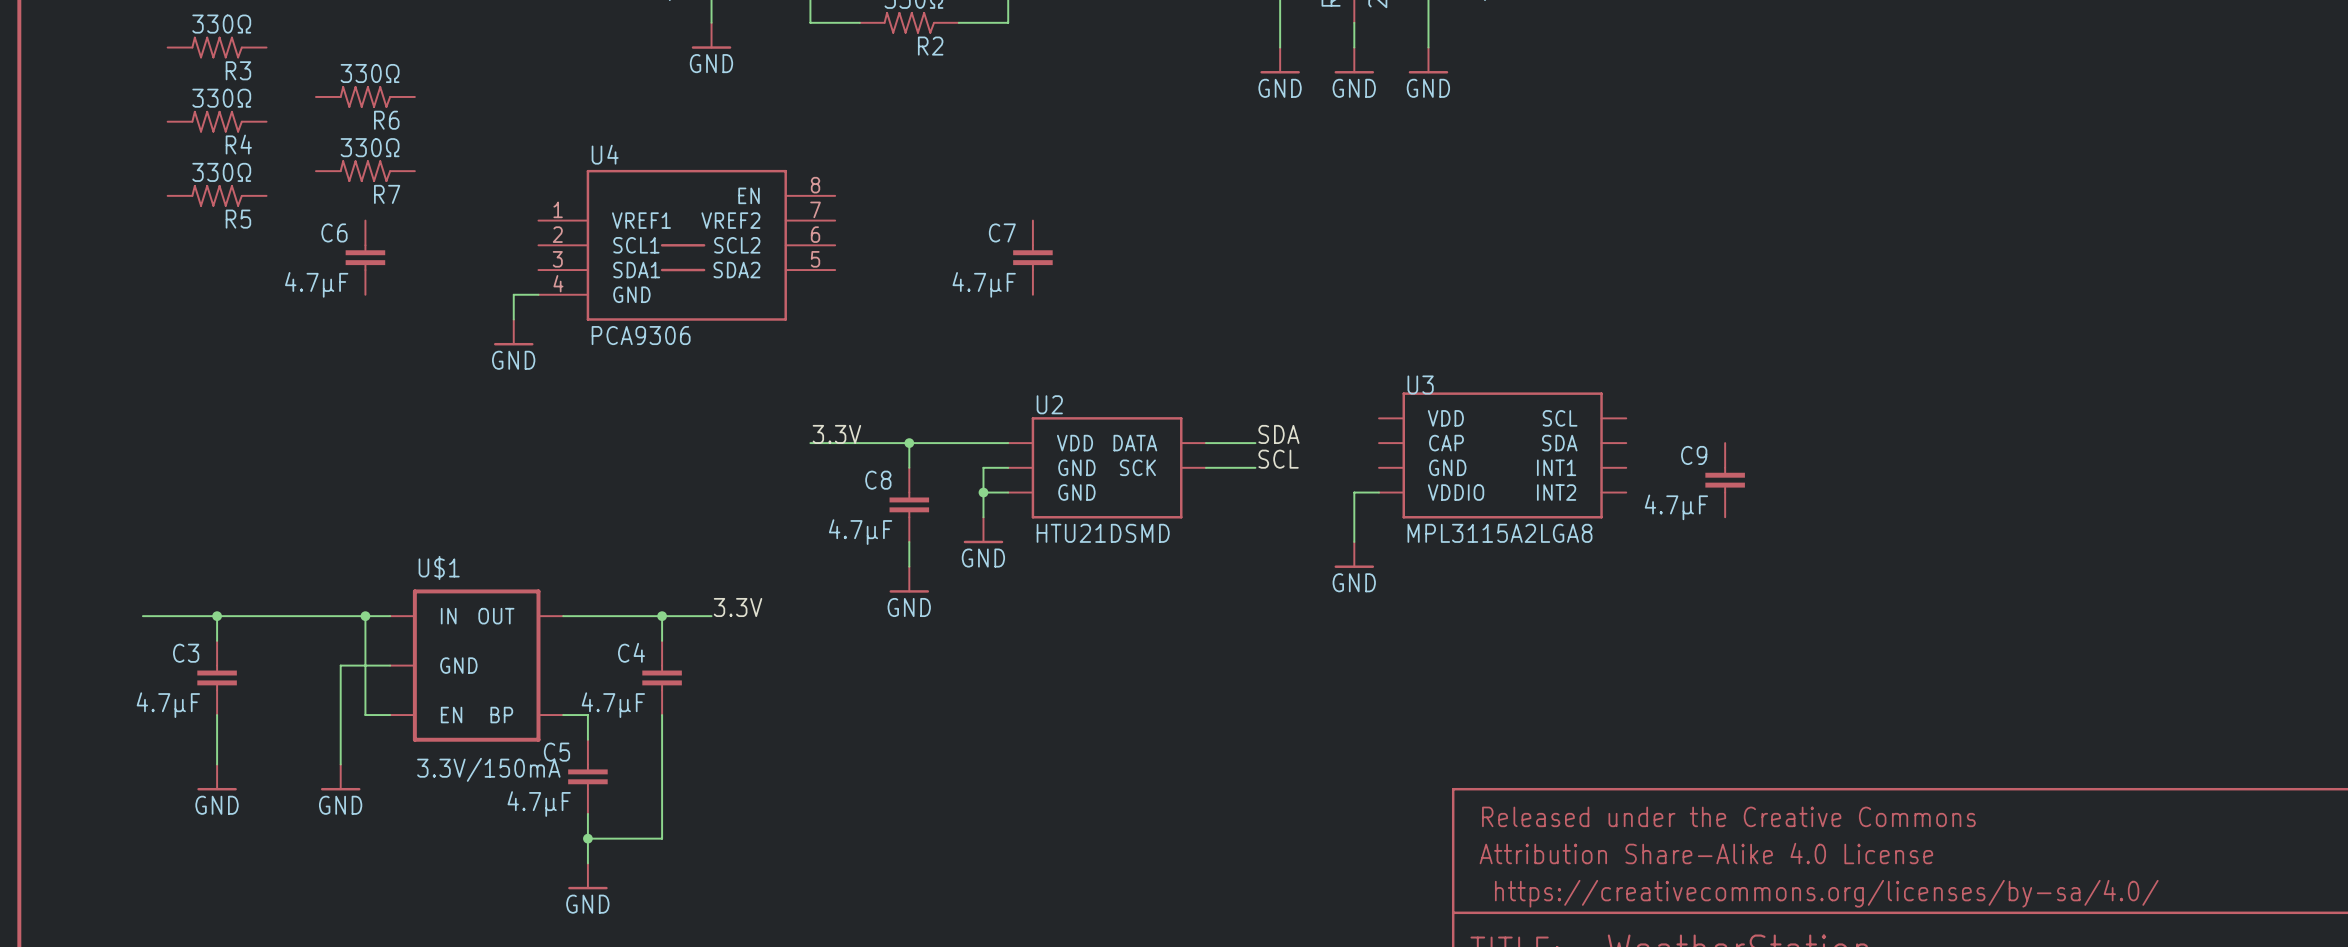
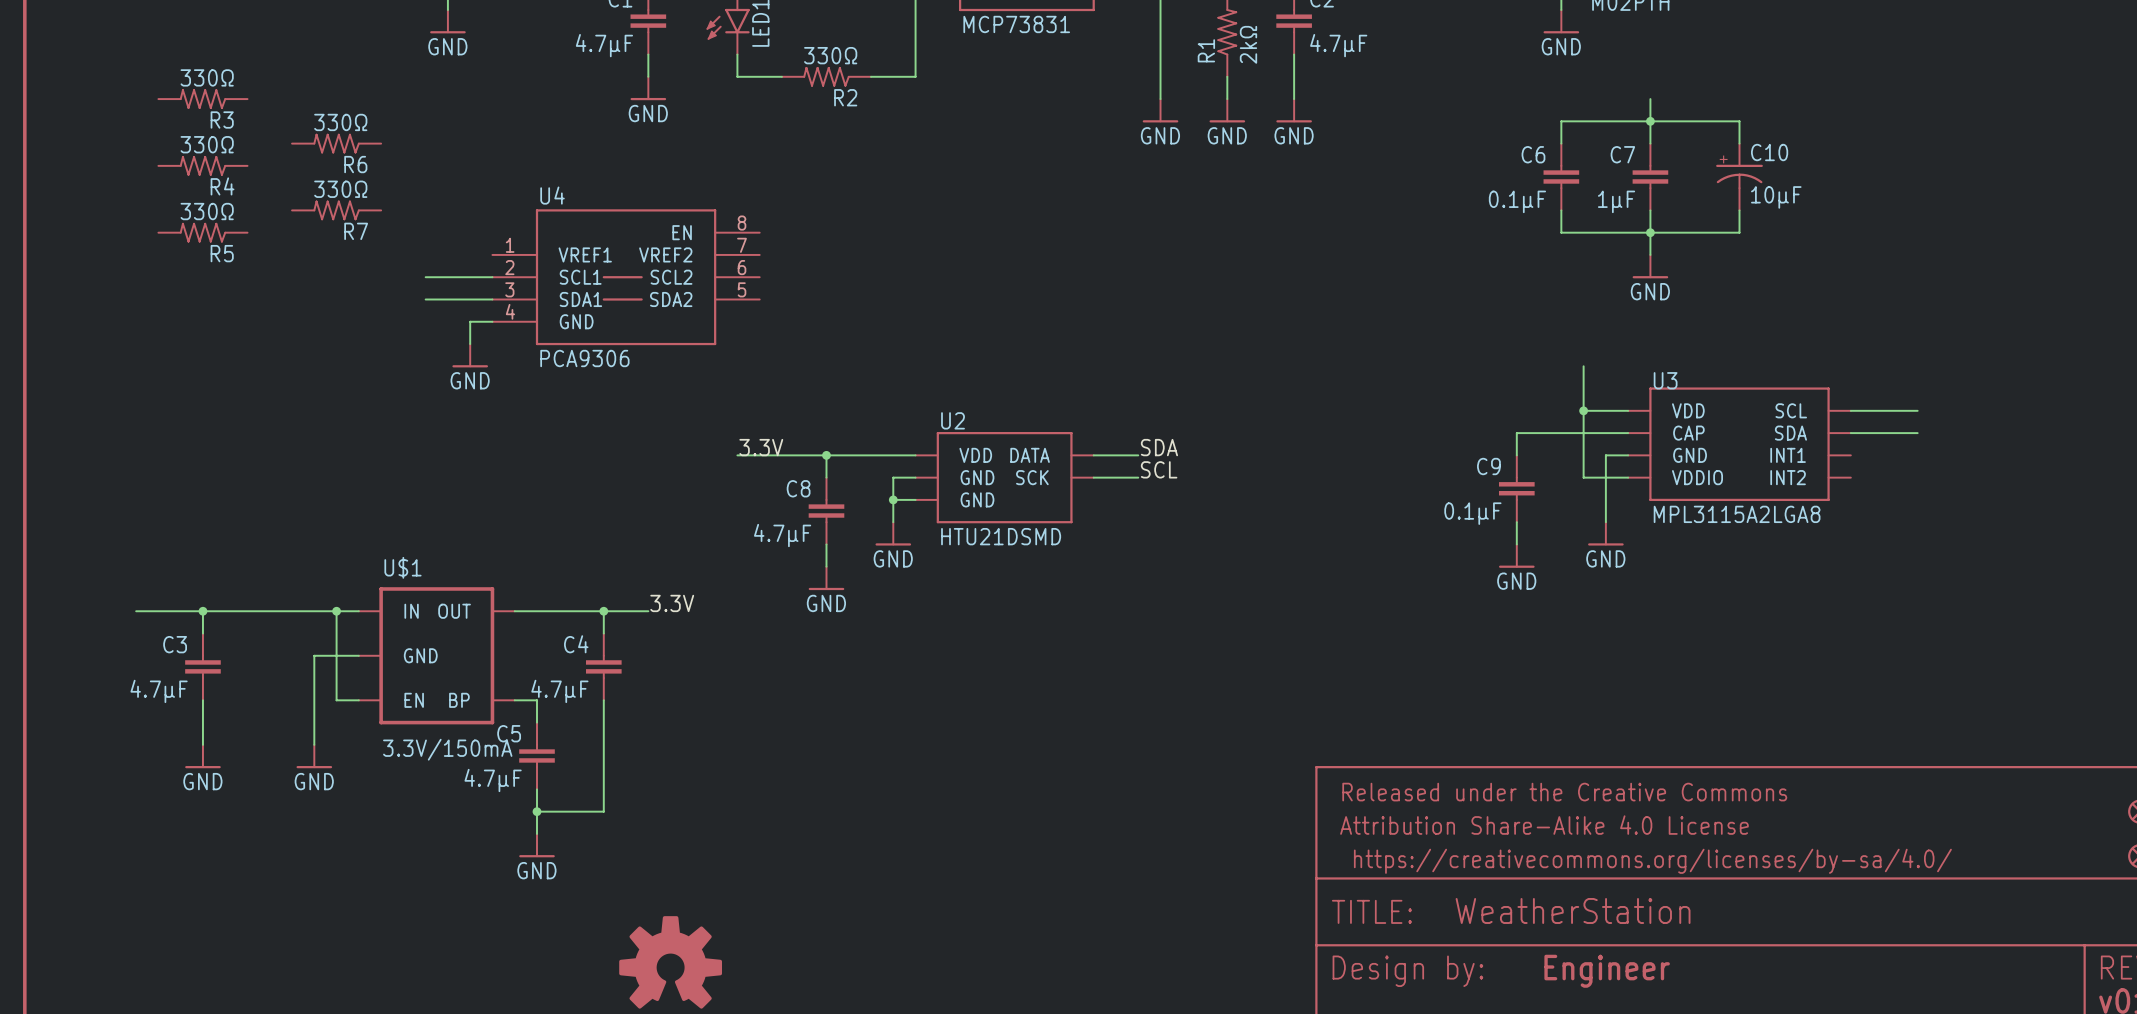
wire: none -> (1650, 99) (1650, 143)
junction: none -> (1650, 121)
wire: none -> (1561, 143) (1561, 121) (1739, 121) (1739, 143)
C10: none -> 10µF (1739, 177)
wire: none -> (1561, 210) (1561, 232) (1739, 232) (1739, 210)
wire: none -> (1650, 210) (1650, 254)
junction: none -> (1650, 232)
power symbol: none -> GND (1650, 266)
wire: none -> (425, 277) (492, 277)
C6 position: (365, 257) -> (1561, 177)
C7 position: (1032, 257) -> (1650, 177)
wire: none -> (425, 299) (492, 299)
C6 value: 4.7µF (316, 284) -> 0.1µF (1517, 201)
C7 value: 4.7µF (984, 284) -> 1µF (1616, 201)
wire: none -> (1583, 366) (1583, 477) (1628, 477)
wire: none -> (1583, 410) (1628, 410)
junction: none -> (1583, 410)
wire: none -> (1850, 410) (1917, 410)
wire: none -> (1628, 433) (1516, 433) (1516, 455)
wire: none -> (1850, 433) (1917, 433)
wire: none -> (1628, 455) (1605, 455) (1605, 522)
U3 position: (1502, 455) -> (1739, 444)
C9 position: (1725, 480) -> (1516, 488)
wire: (1379, 492) (1354, 492) (1354, 541) -> none
C9 value: 4.7µF (1676, 507) -> 0.1µF (1472, 513)
wire: none -> (1516, 522) (1516, 544)
power symbol: none -> GND (1605, 533)
power symbol: GND (1354, 554) -> none
power symbol: none -> GND (1516, 556)

